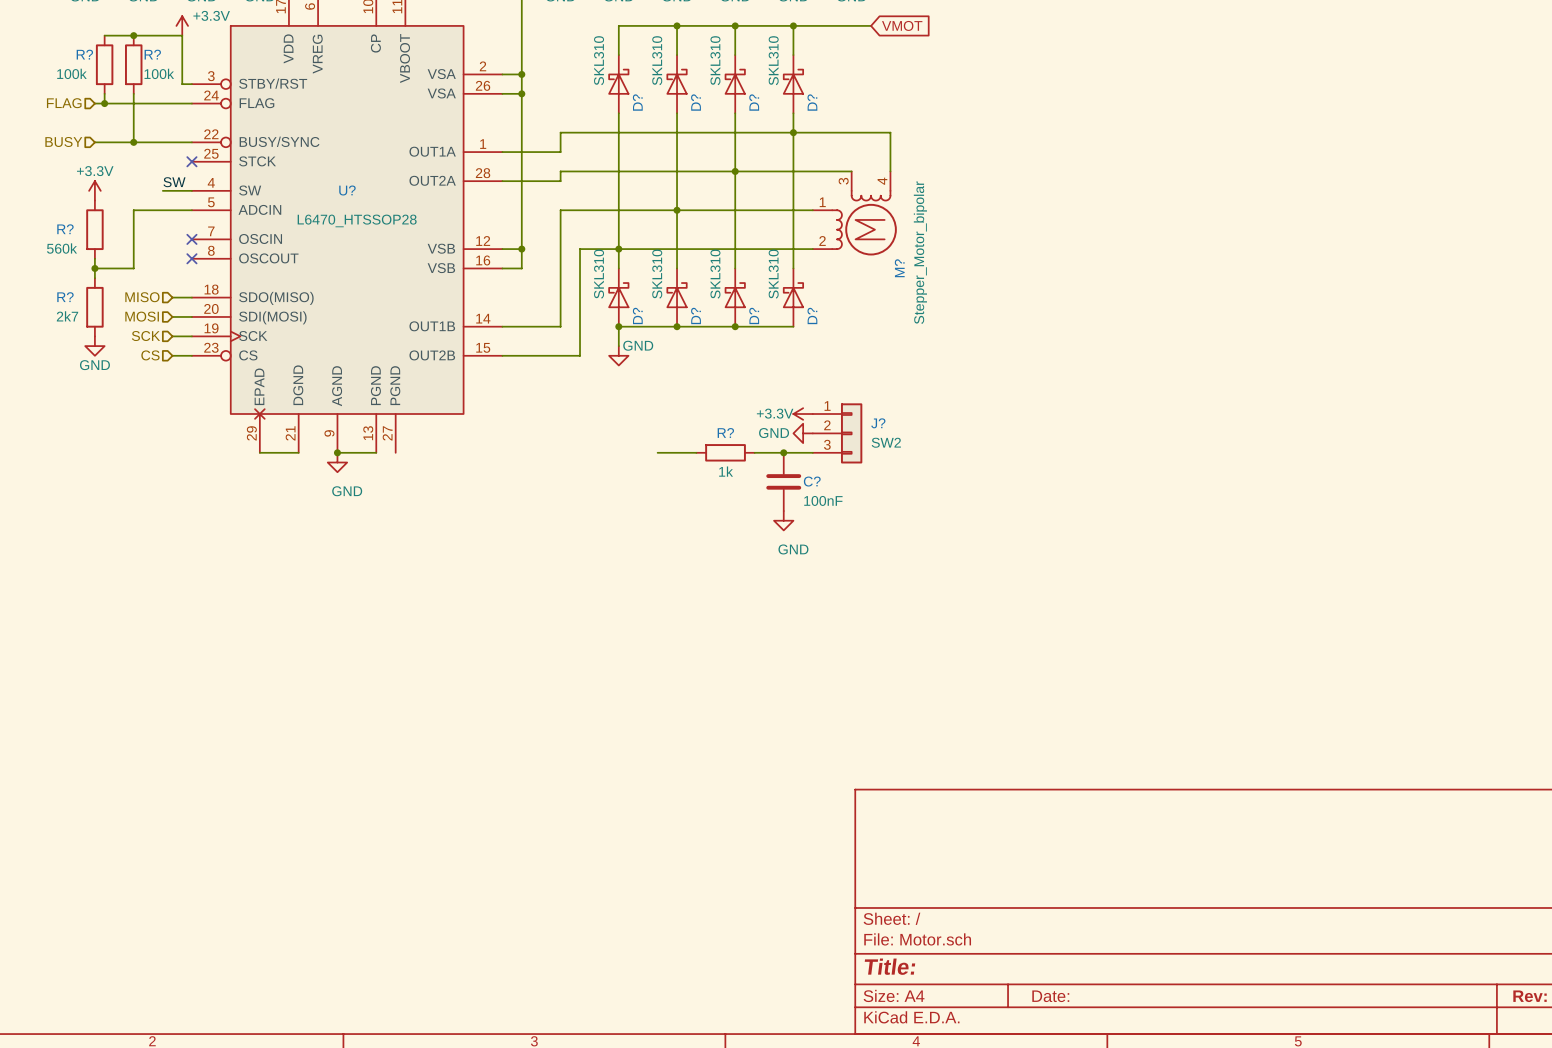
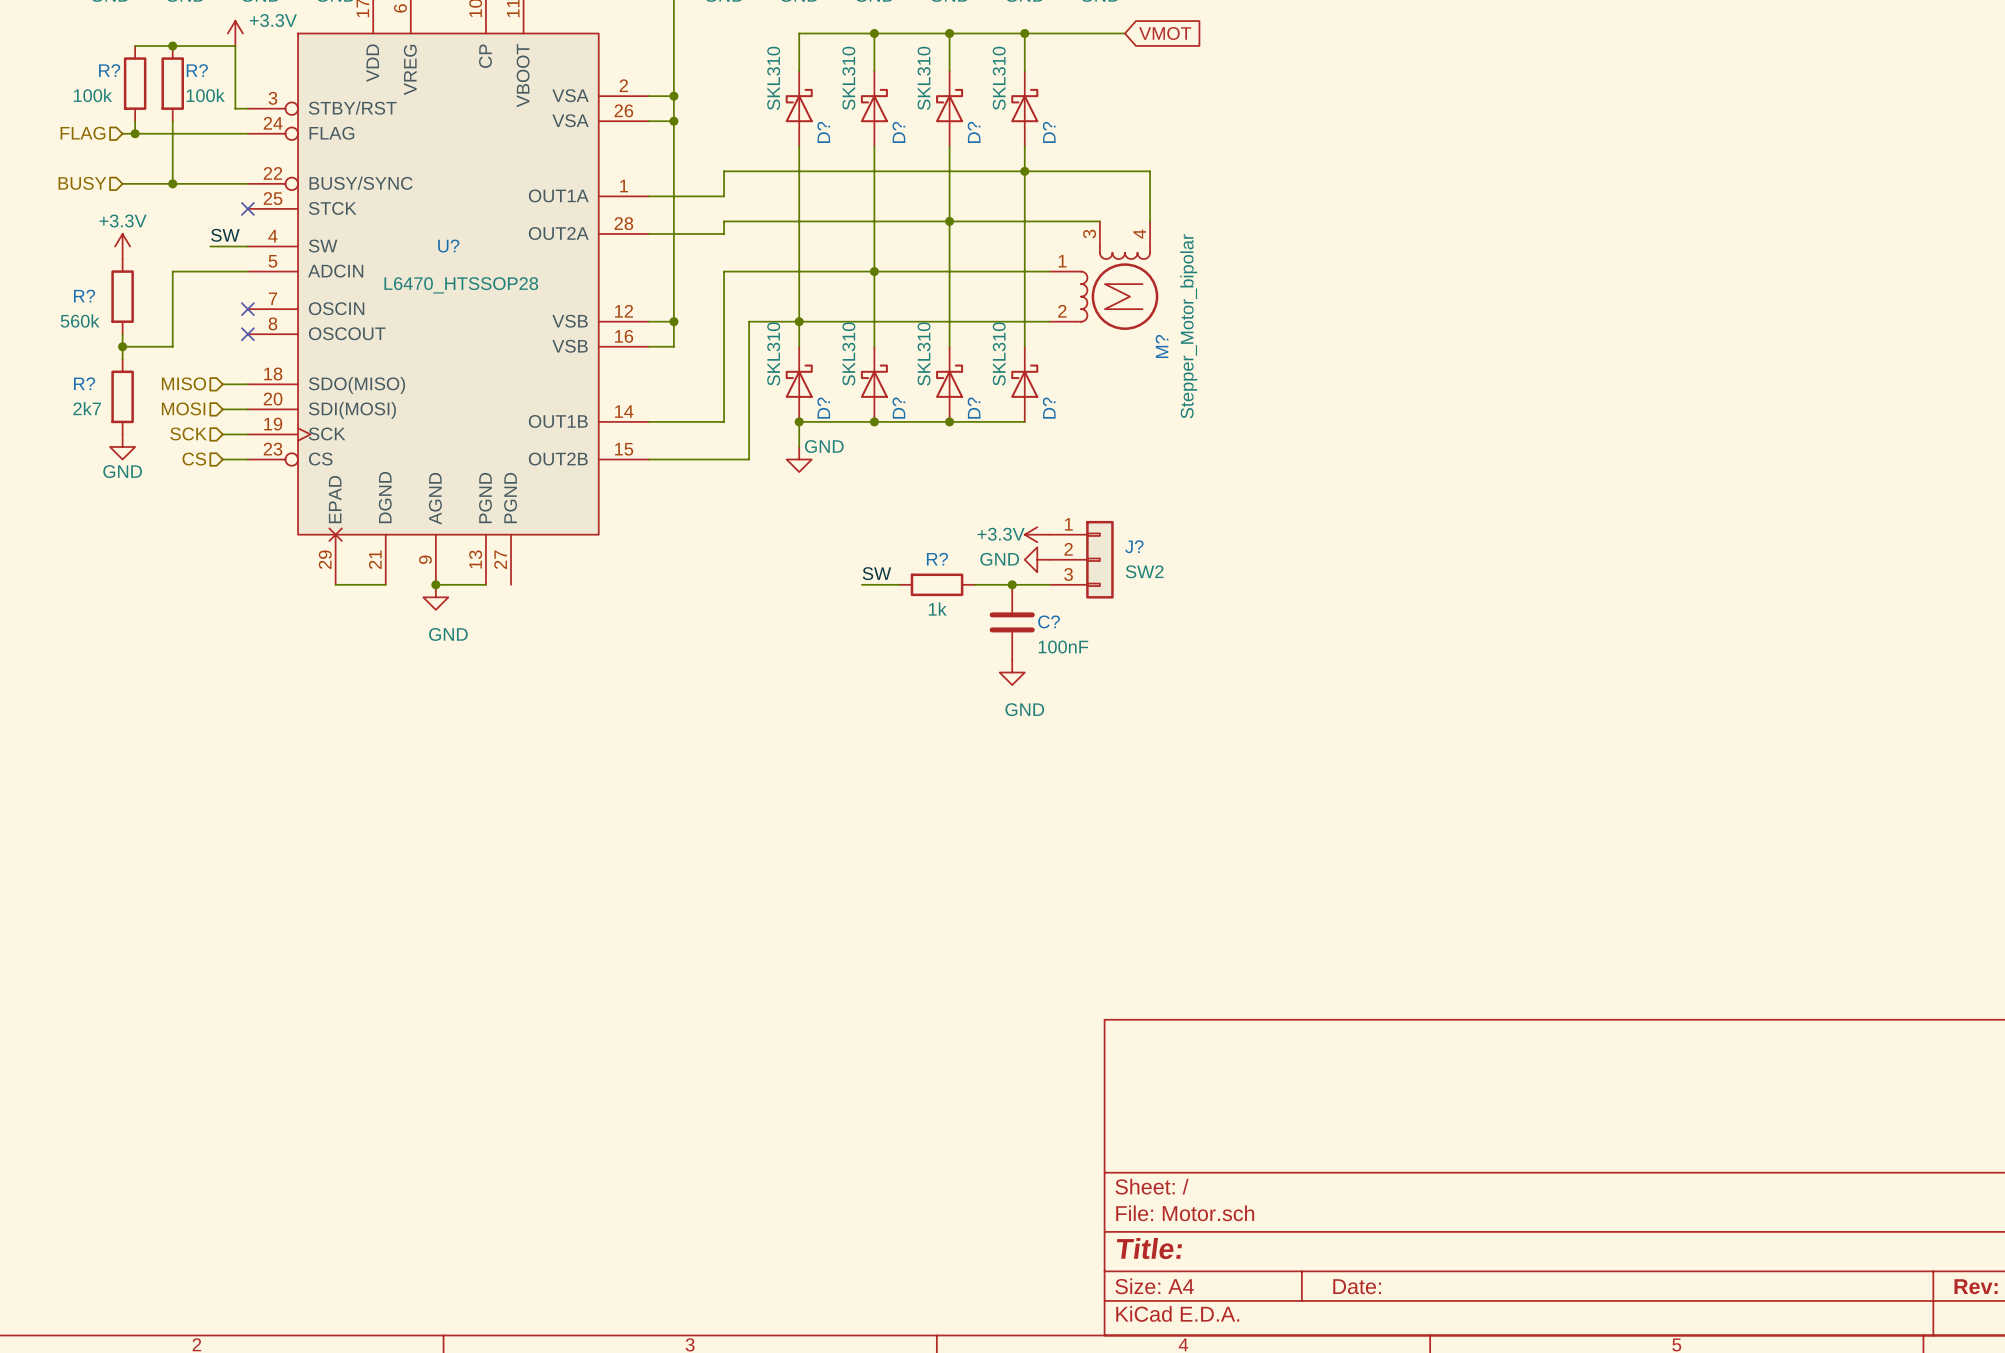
label: none -> SW (876, 573)
wire: (657, 452) (667, 452) -> none

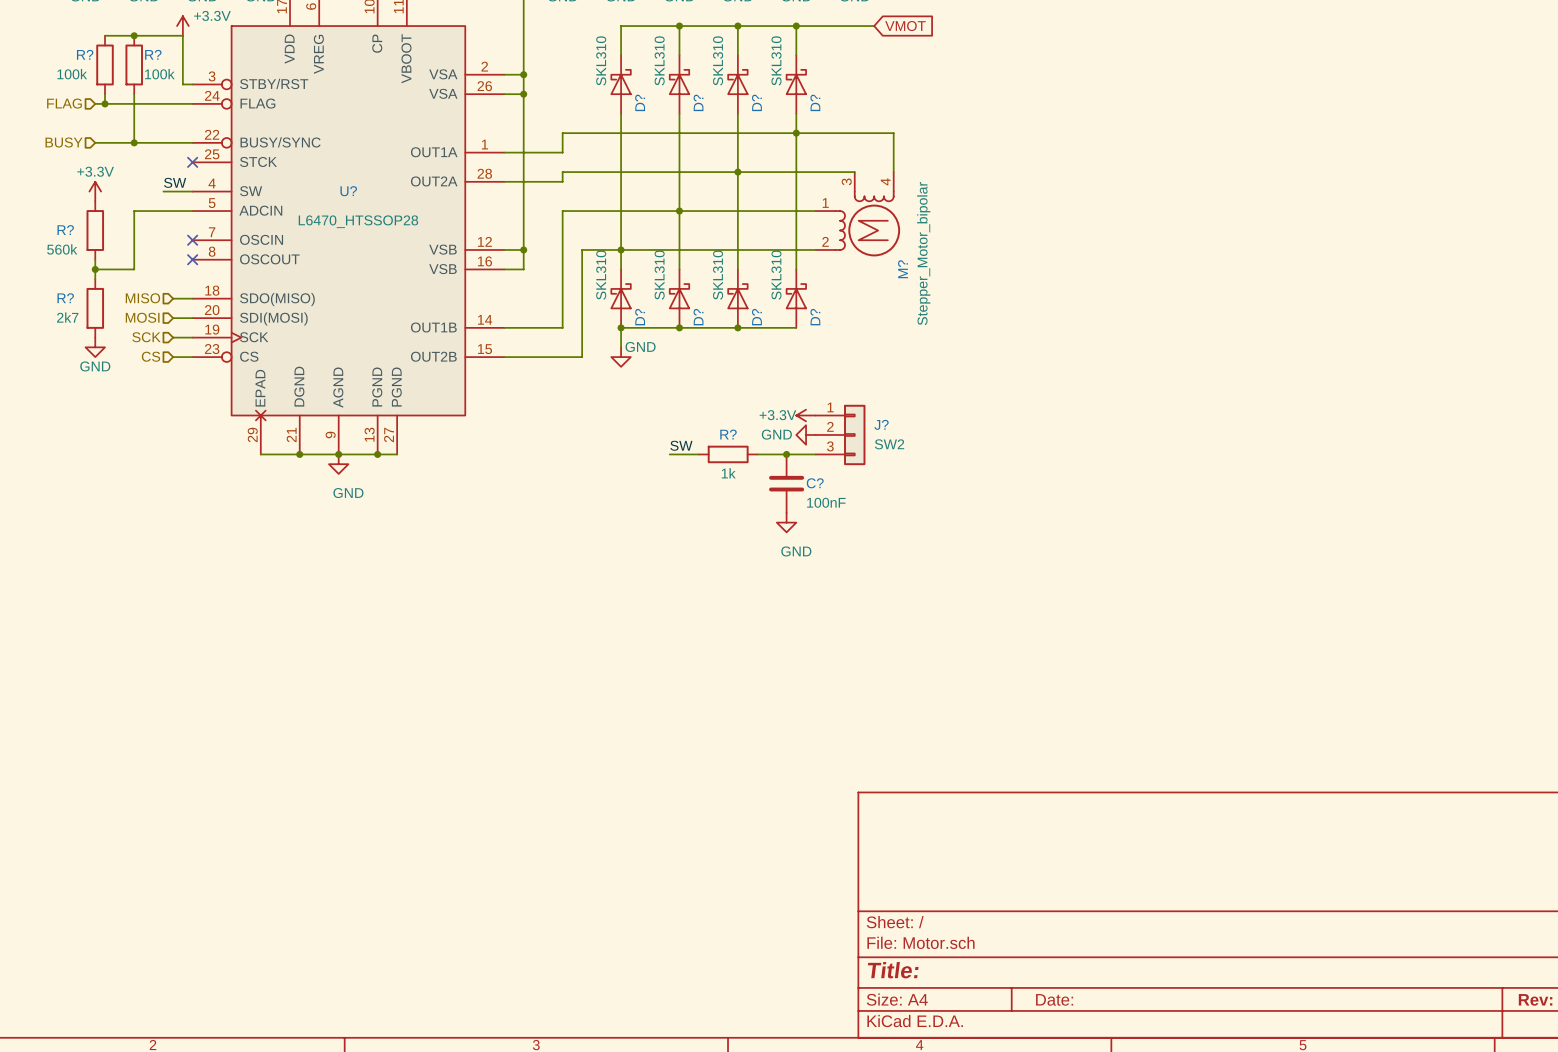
wire: none -> (299, 454) (338, 454)
junction: none -> (299, 454)
wire: none -> (377, 454) (397, 454)
junction: none -> (377, 454)

